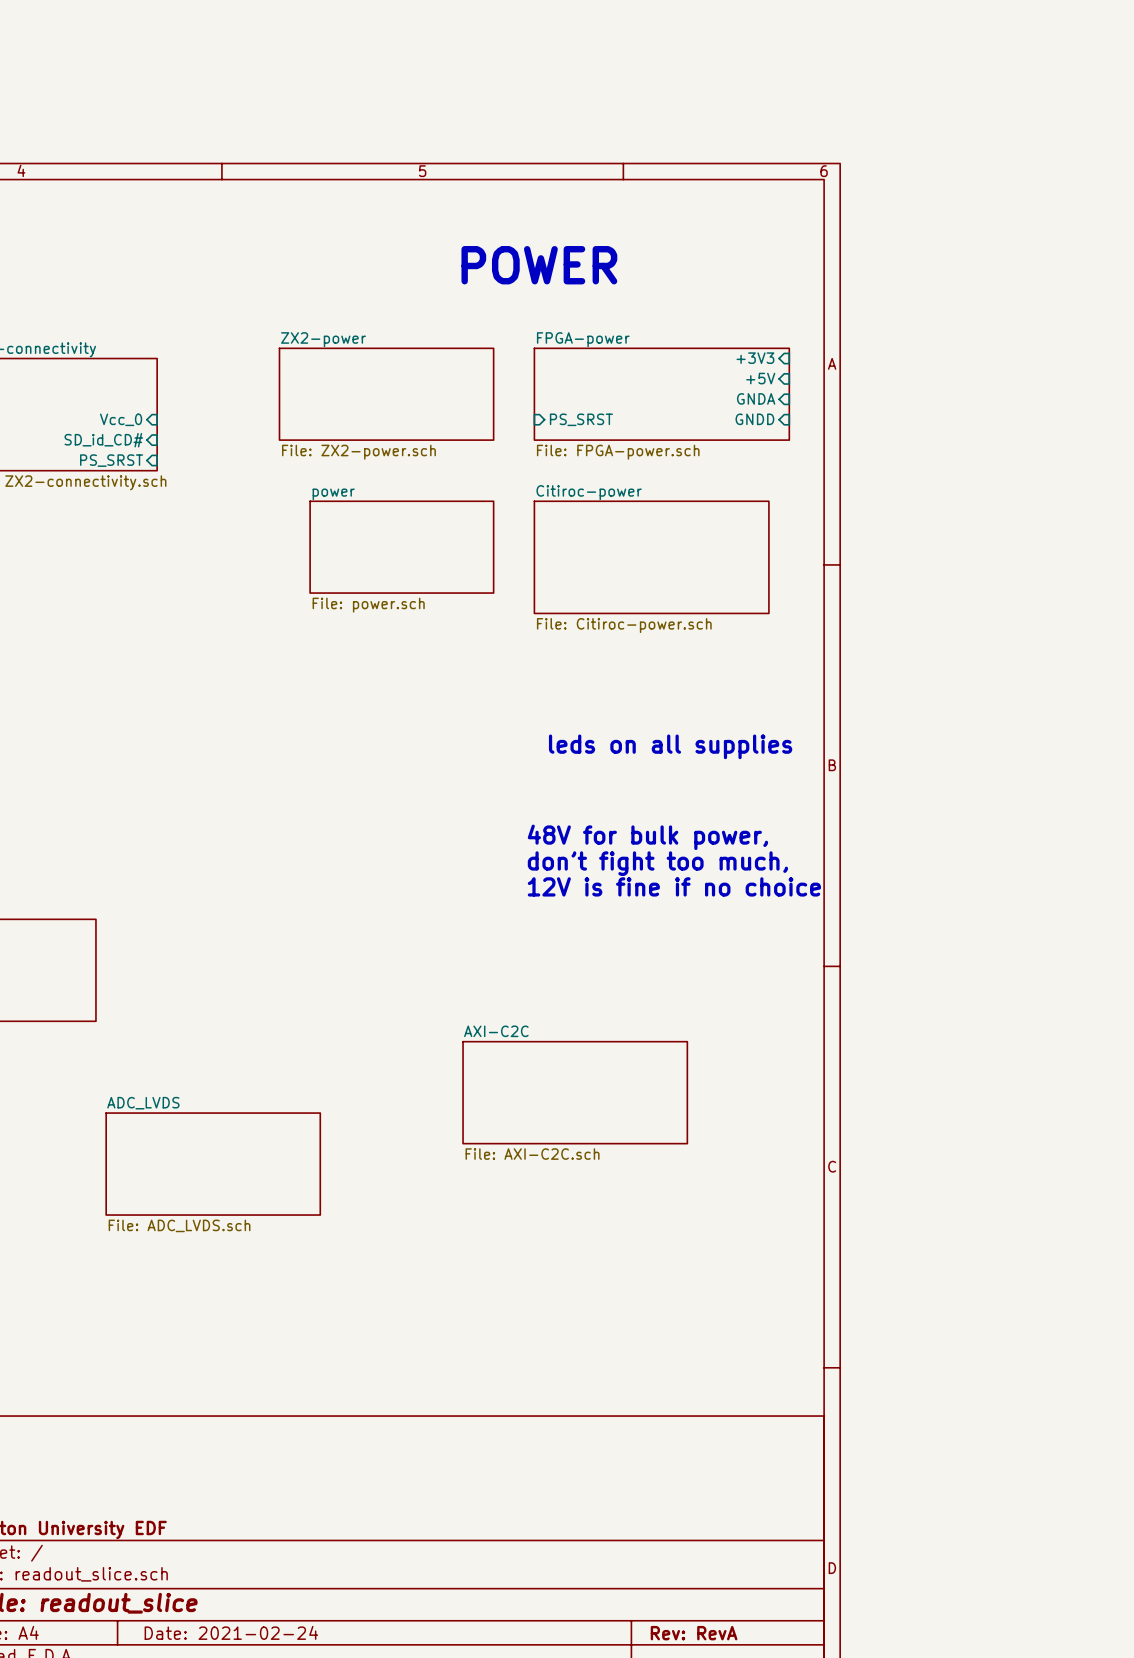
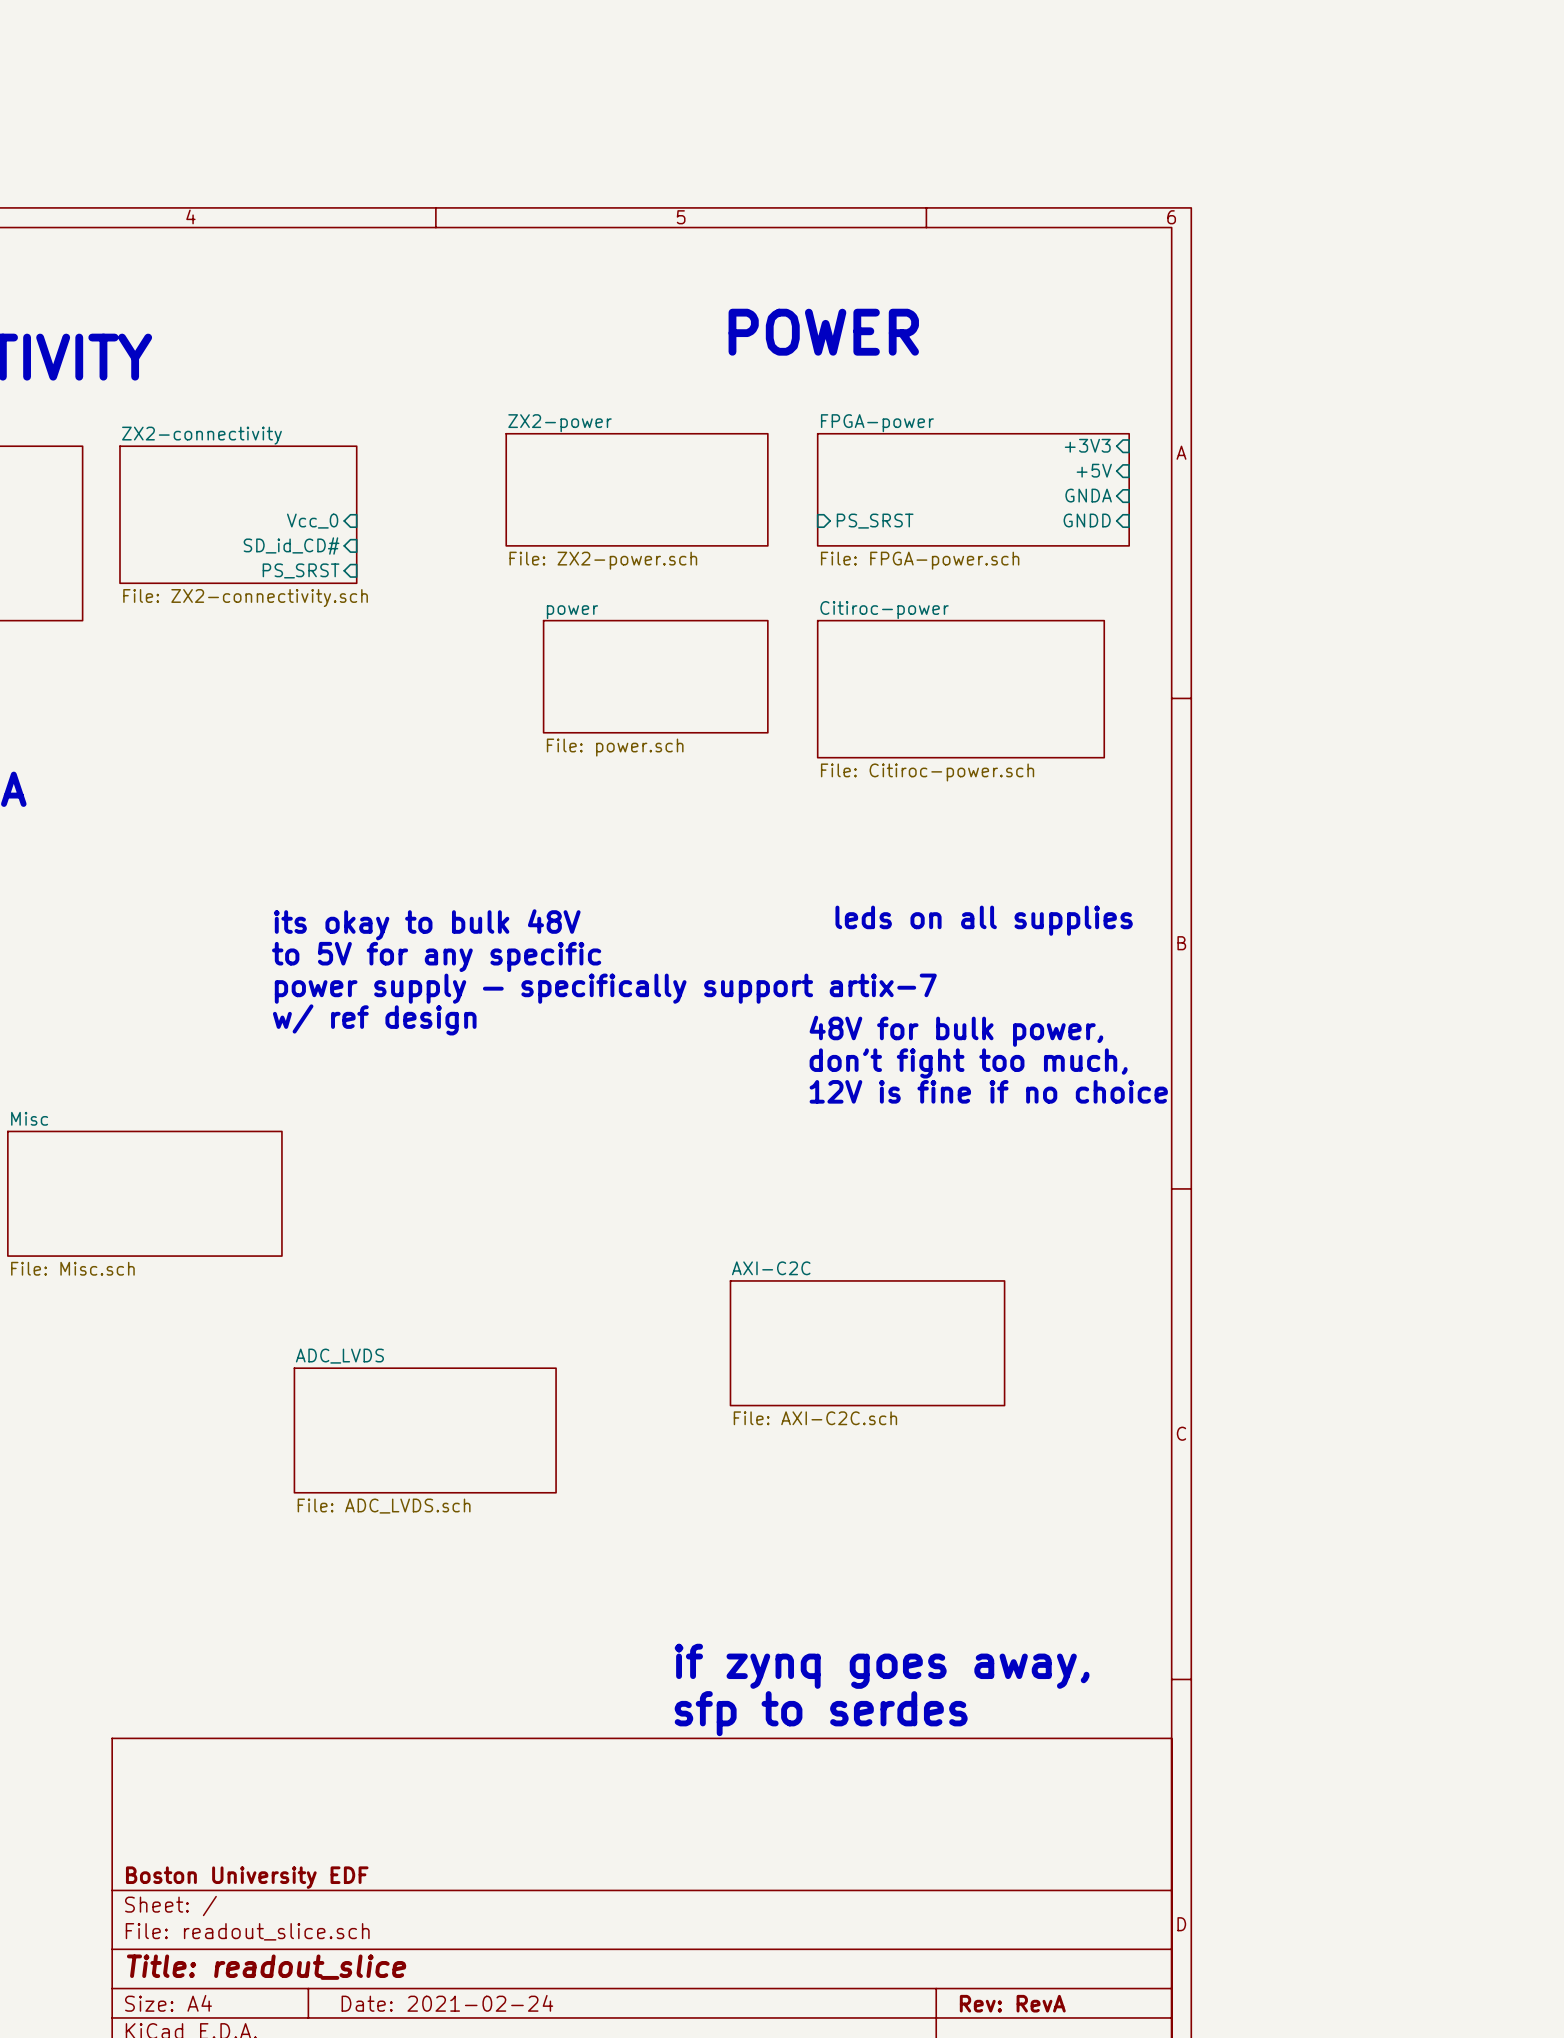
text: none -> its okay to bulk 48V (427, 924)
text: none -> to 5V for any specific (436, 956)
text: none -> power supply — specifically support artix-7 (605, 988)
text: none -> w/ ref design (374, 1019)
text: none -> if zynq goes away, (882, 1666)
text: none -> sfp to serdes (821, 1713)

